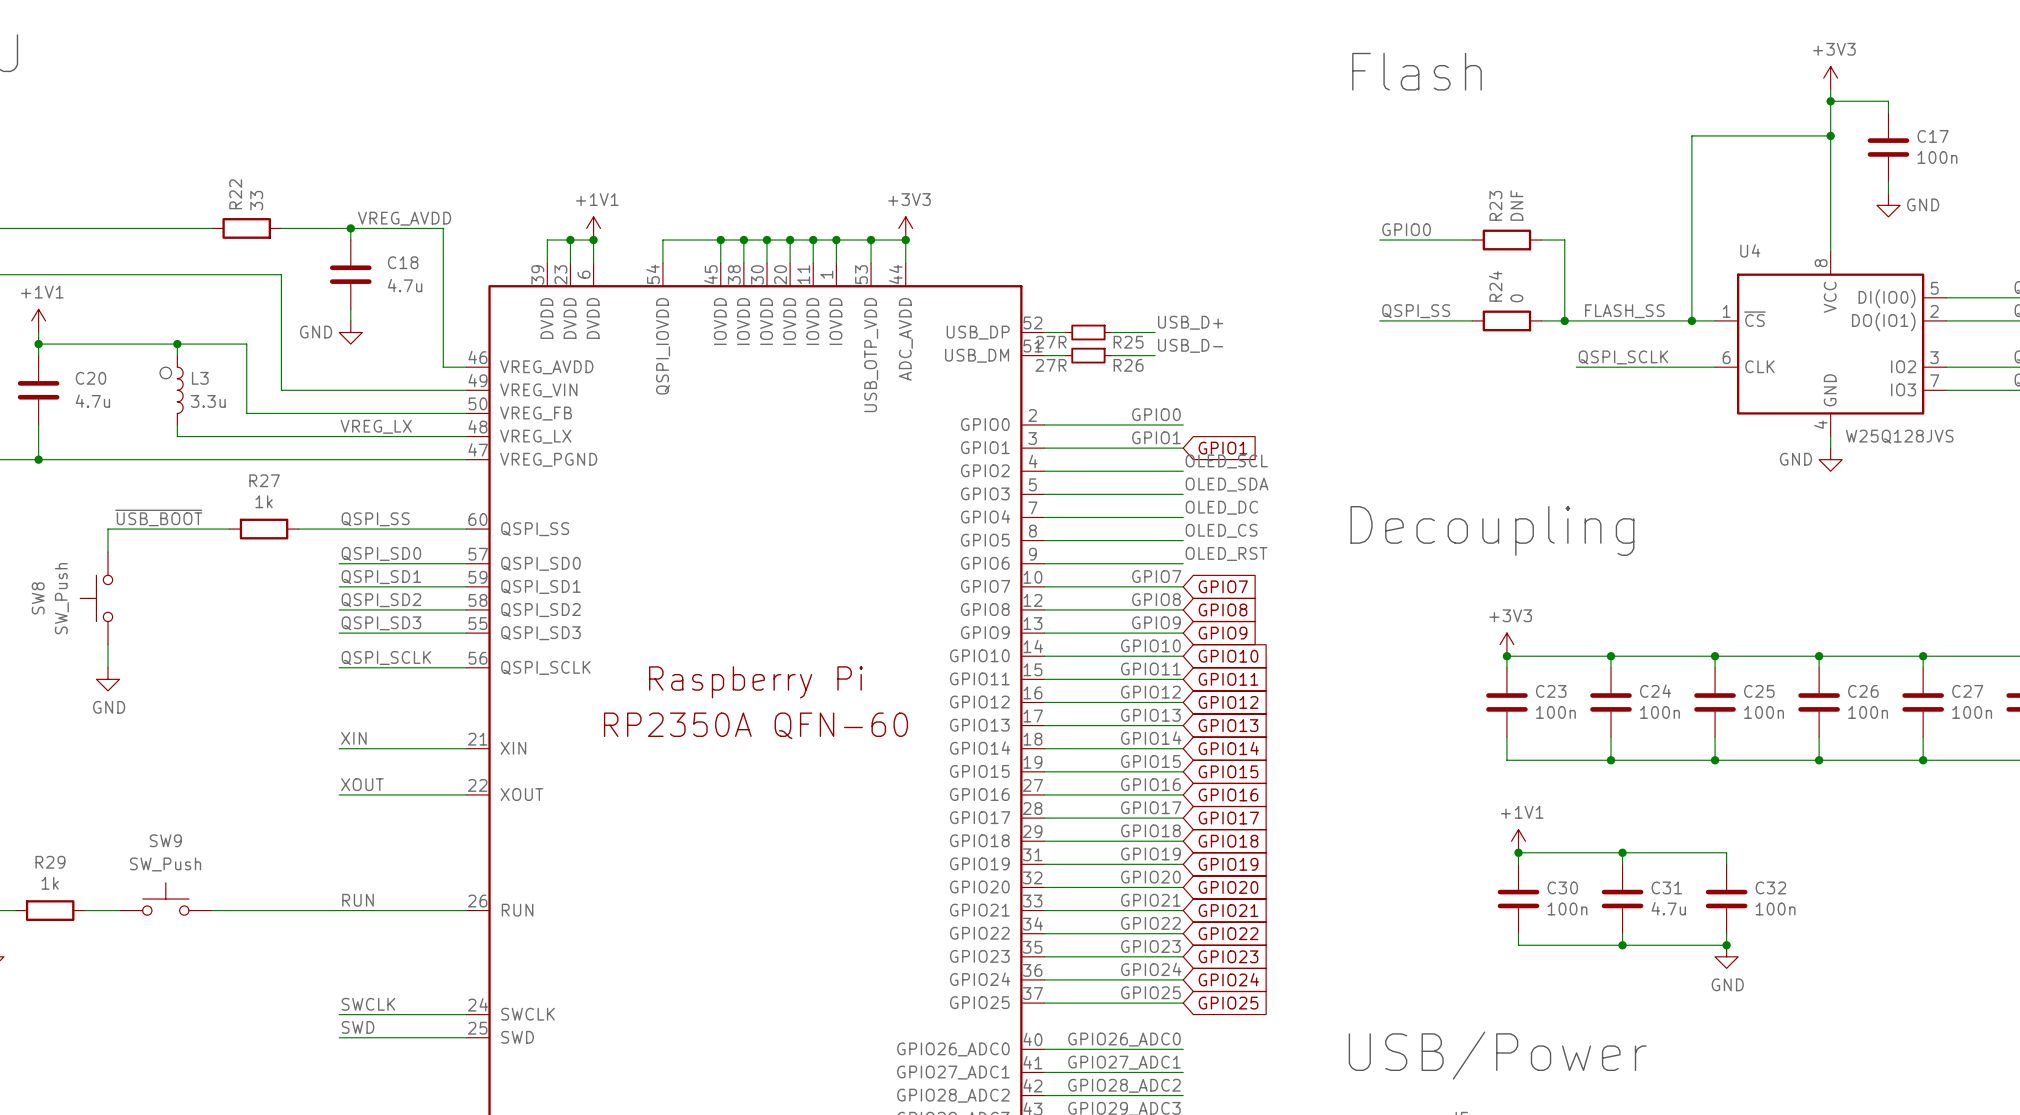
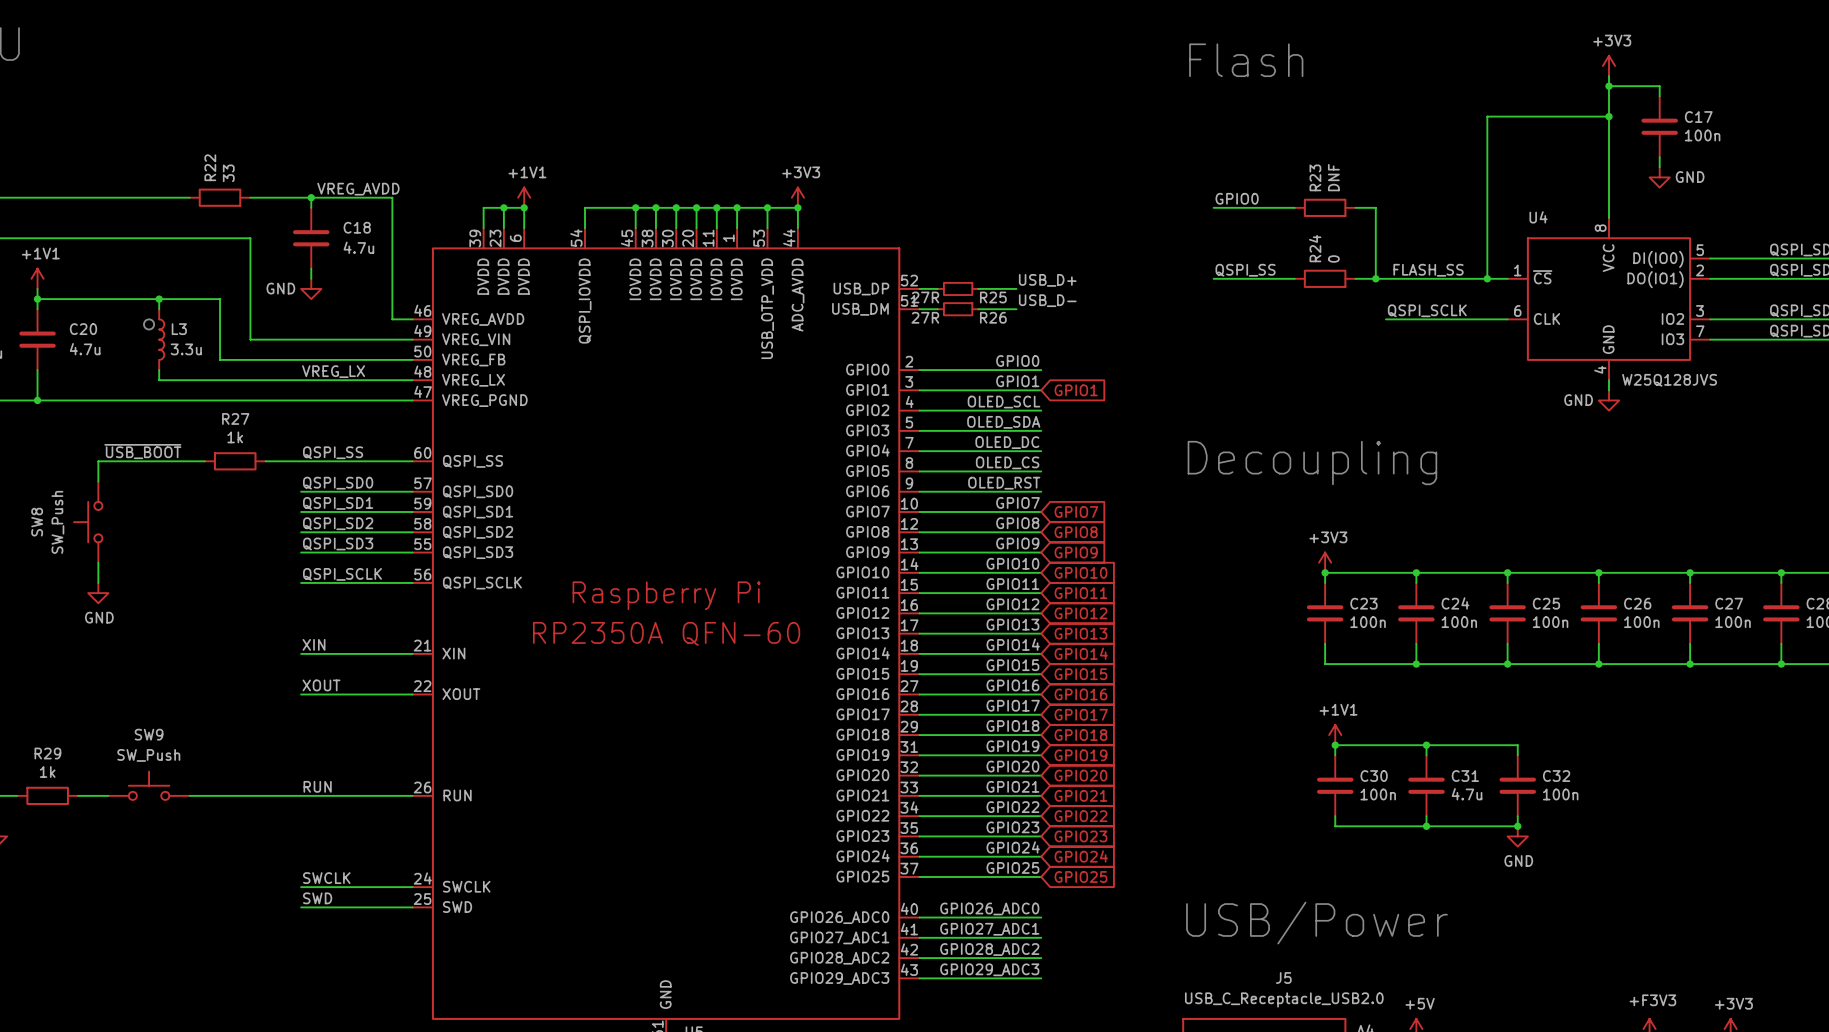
label position: OLED_SCL (1226, 461) -> OLED_SCL (1003, 402)
label position: OLED_SDA (1227, 484) -> OLED_SDA (1003, 422)
label position: OLED_DC (1221, 507) -> OLED_DC (1007, 442)
label position: OLED_CS (1221, 530) -> OLED_CS (1007, 462)
label position: OLED_RST (1226, 553) -> OLED_RST (1004, 483)

